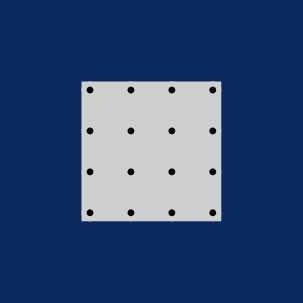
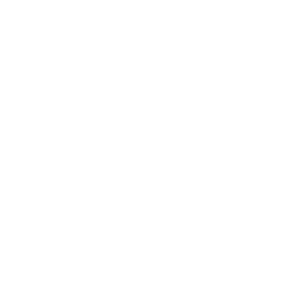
part: (151, 151) -> none

